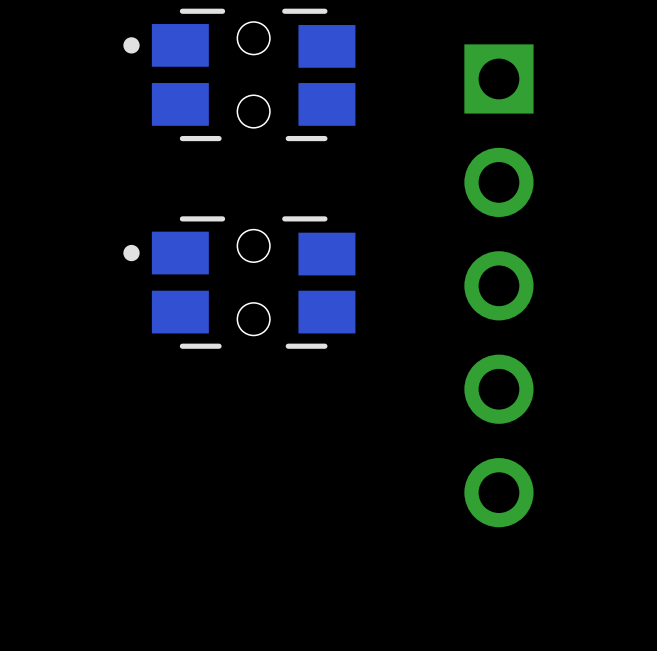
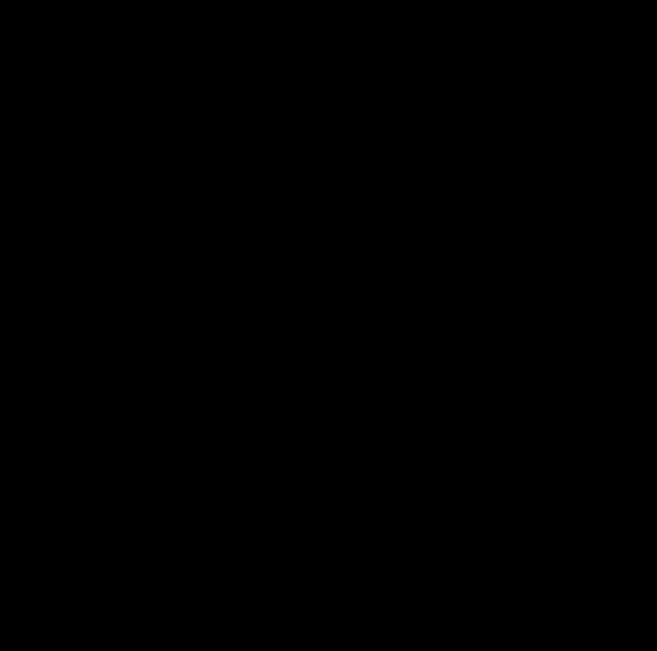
part: (239, 74) -> none
part: (239, 282) -> none
part: (498, 285) -> none

